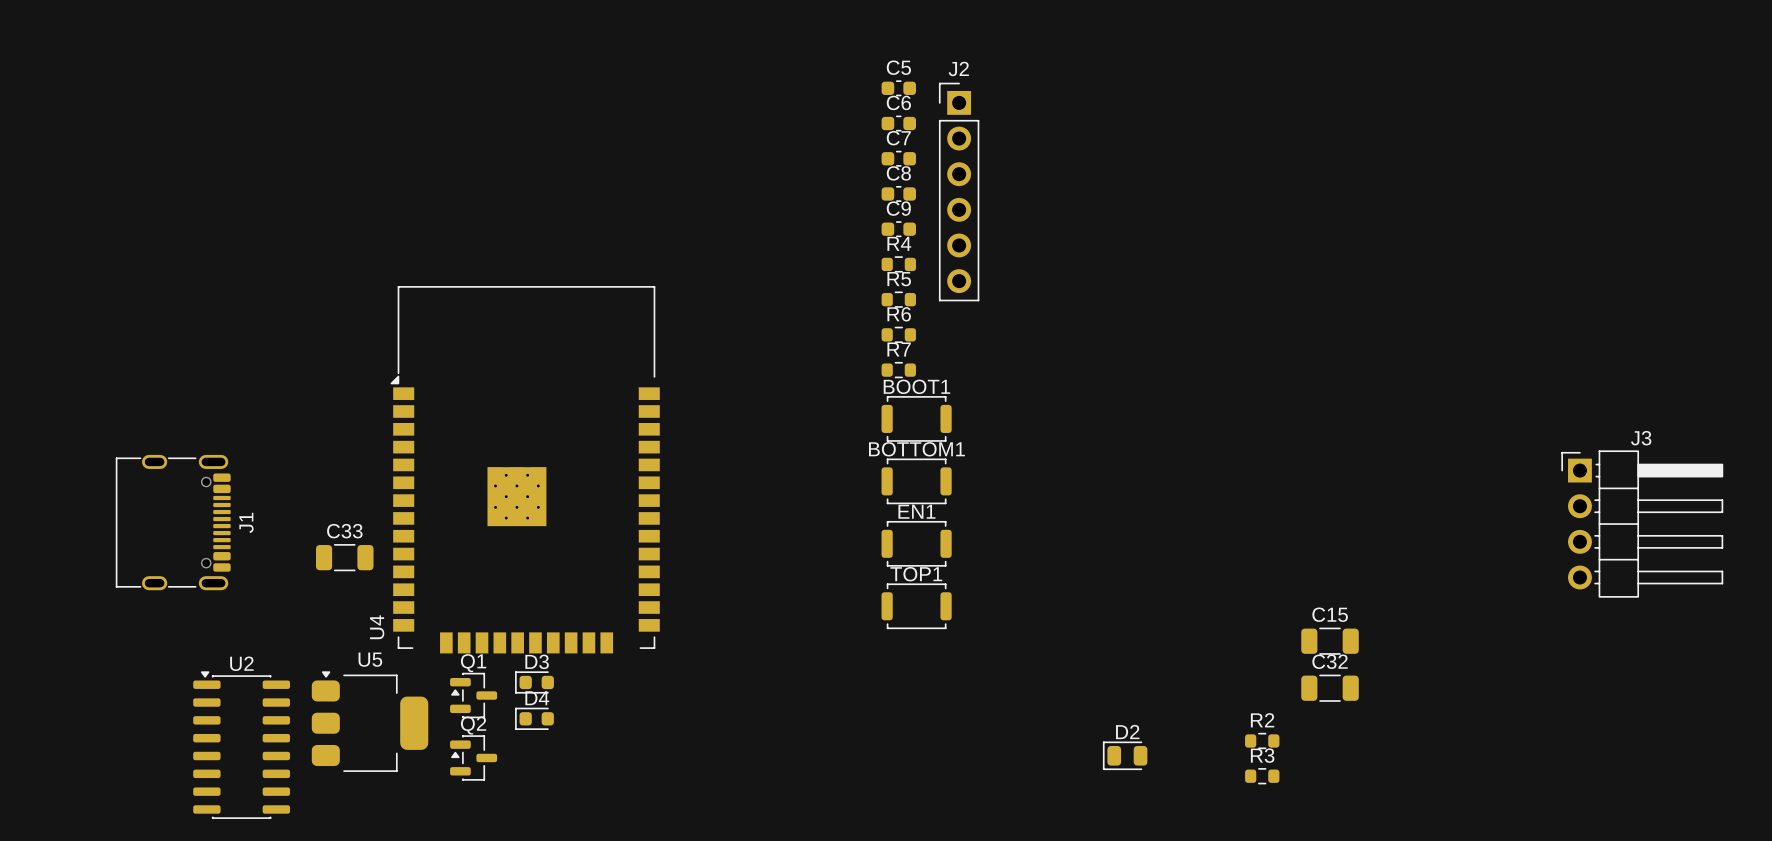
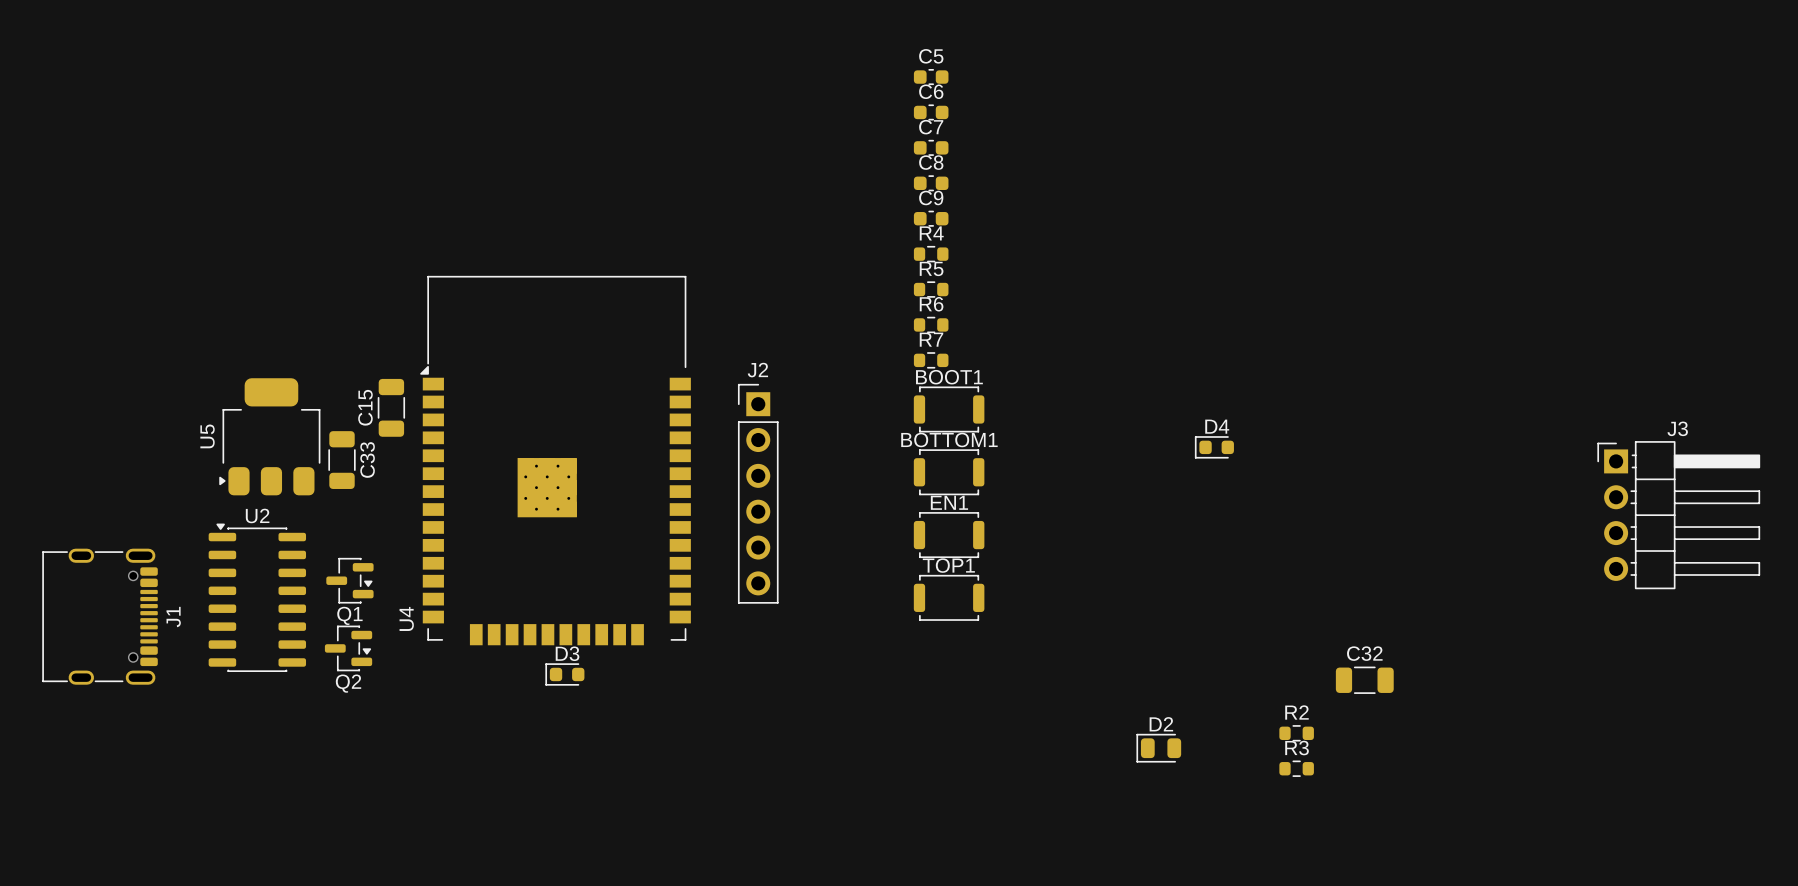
J2 position: (959, 192) -> (758, 493)
J1 position: (173, 522) -> (100, 616)
C33 rotation: 0° (344, 557) -> 90° clockwise (342, 460)
C33 position: (344, 557) -> (342, 460)
C15 name position: C15 (1330, 614) -> C15 (365, 407)
C15 rotation: 0° (1330, 641) -> 90° clockwise (391, 407)
C15 position: (1330, 641) -> (391, 407)
Q1 rotation: 0° (473, 695) -> 180° (349, 580)
Q1 position: (473, 695) -> (349, 580)
D4 position: (534, 718) -> (1214, 447)
U5 rotation: 0° (370, 721) -> 90° counterclockwise (269, 436)
U5 position: (370, 721) -> (269, 436)
U2 position: (241, 745) -> (257, 597)
Q2 rotation: 0° (473, 757) -> 180° (348, 648)
Q2 position: (473, 757) -> (348, 648)

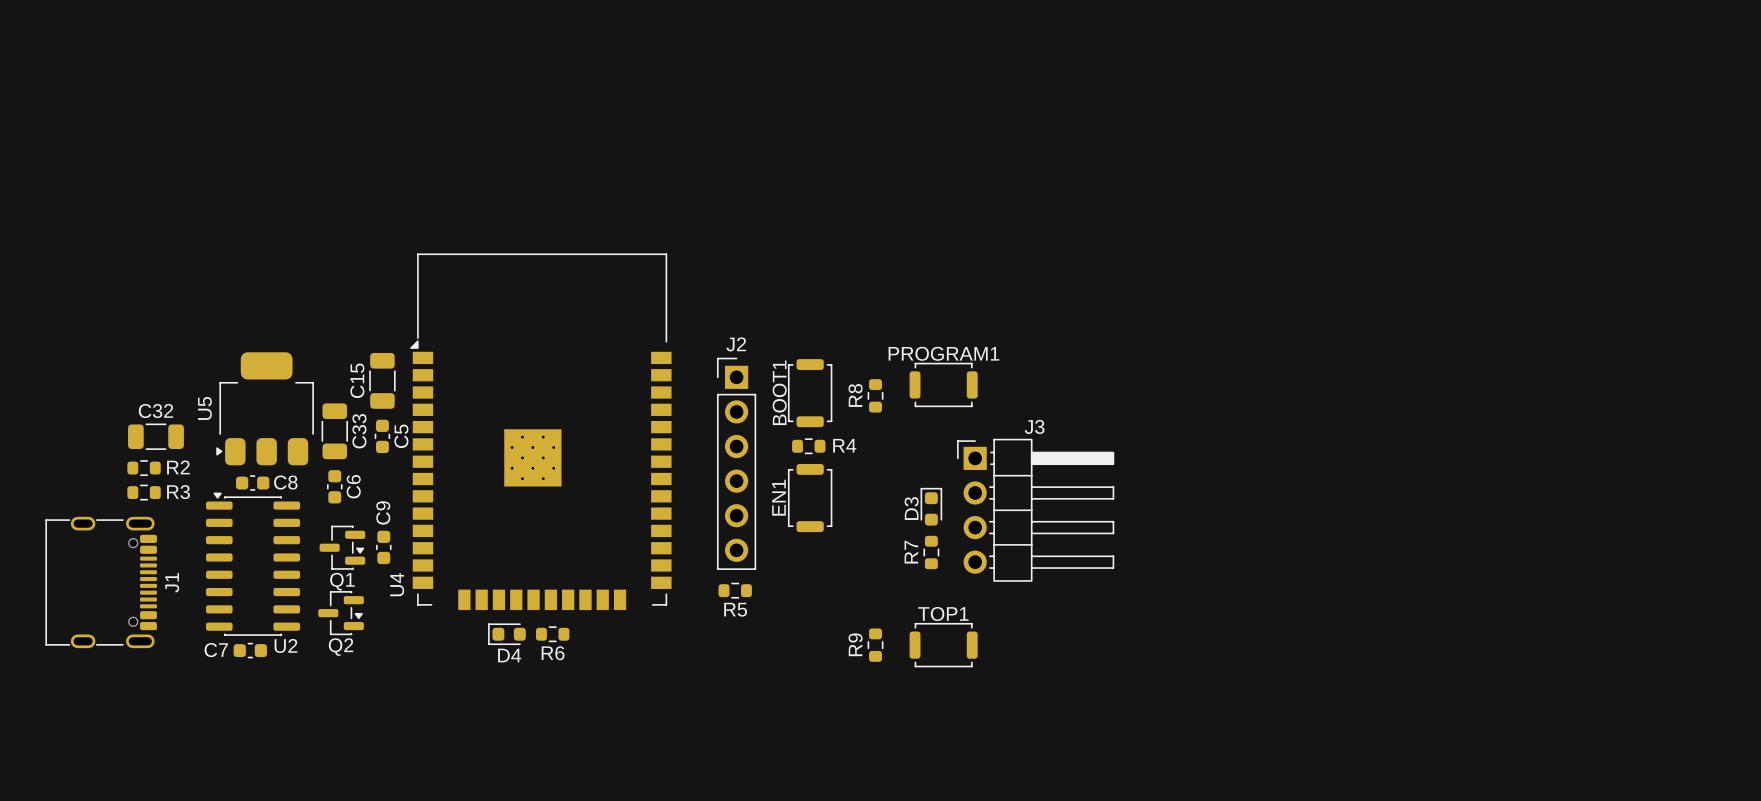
C5 rotation: 0° (931, 77) -> 90° clockwise (382, 436)
C5 position: (931, 77) -> (382, 436)
C6 rotation: 0° (931, 112) -> 90° clockwise (334, 486)
C6 position: (931, 112) -> (334, 486)
C7 name position: C7 (931, 127) -> C7 (216, 650)
C7 position: (931, 147) -> (250, 650)
C8 name position: C8 (931, 162) -> C8 (285, 482)
C8 position: (931, 183) -> (252, 483)
C9 rotation: 0° (931, 218) -> 90° clockwise (383, 547)
C9 position: (931, 218) -> (383, 547)
R4 name position: R4 (931, 233) -> R4 (844, 445)
R4 position: (931, 254) -> (808, 446)
R5 name position: R5 (931, 268) -> R5 (735, 609)
R5 position: (931, 289) -> (735, 590)
R6 name position: R6 (931, 304) -> R6 (553, 653)
R6 position: (931, 324) -> (552, 634)
R7 name position: R7 (931, 339) -> R7 (911, 552)
R7 rotation: 0° (931, 360) -> 90° clockwise (931, 552)
R7 position: (931, 360) -> (931, 552)
BOOT1 name position: BOOT1 (949, 377) -> BOOT1 (779, 392)
BOOT1 rotation: 0° (949, 409) -> 90° clockwise (810, 393)
BOOT1 position: (949, 409) -> (810, 393)
PROGRAM1: none -> (943, 384)
R8: none -> (875, 395)
D4 name position: D4 (1217, 426) -> D4 (509, 655)
D4 position: (1214, 447) -> (506, 634)
BOTTOM1: (949, 472) -> none
EN1 name position: EN1 (949, 502) -> EN1 (778, 497)
U2 name position: U2 (257, 515) -> U2 (285, 645)
J3 position: (1678, 515) -> (1035, 510)
EN1 rotation: 0° (949, 535) -> 90° clockwise (810, 498)
EN1 position: (949, 535) -> (810, 498)
TOP1 position: (949, 597) -> (943, 645)
D3 name position: D3 (567, 653) -> D3 (911, 508)
D3 rotation: 0° (564, 674) -> 90° clockwise (931, 506)
D3 position: (564, 674) -> (931, 506)
C32 position: (1364, 680) -> (155, 436)
R9: none -> (875, 645)
R2 name position: R2 (1296, 712) -> R2 (178, 467)
R2 position: (1296, 733) -> (144, 468)
D2: (1158, 748) -> none
R3 name position: R3 (1297, 748) -> R3 (178, 492)
R3 position: (1296, 768) -> (144, 492)

